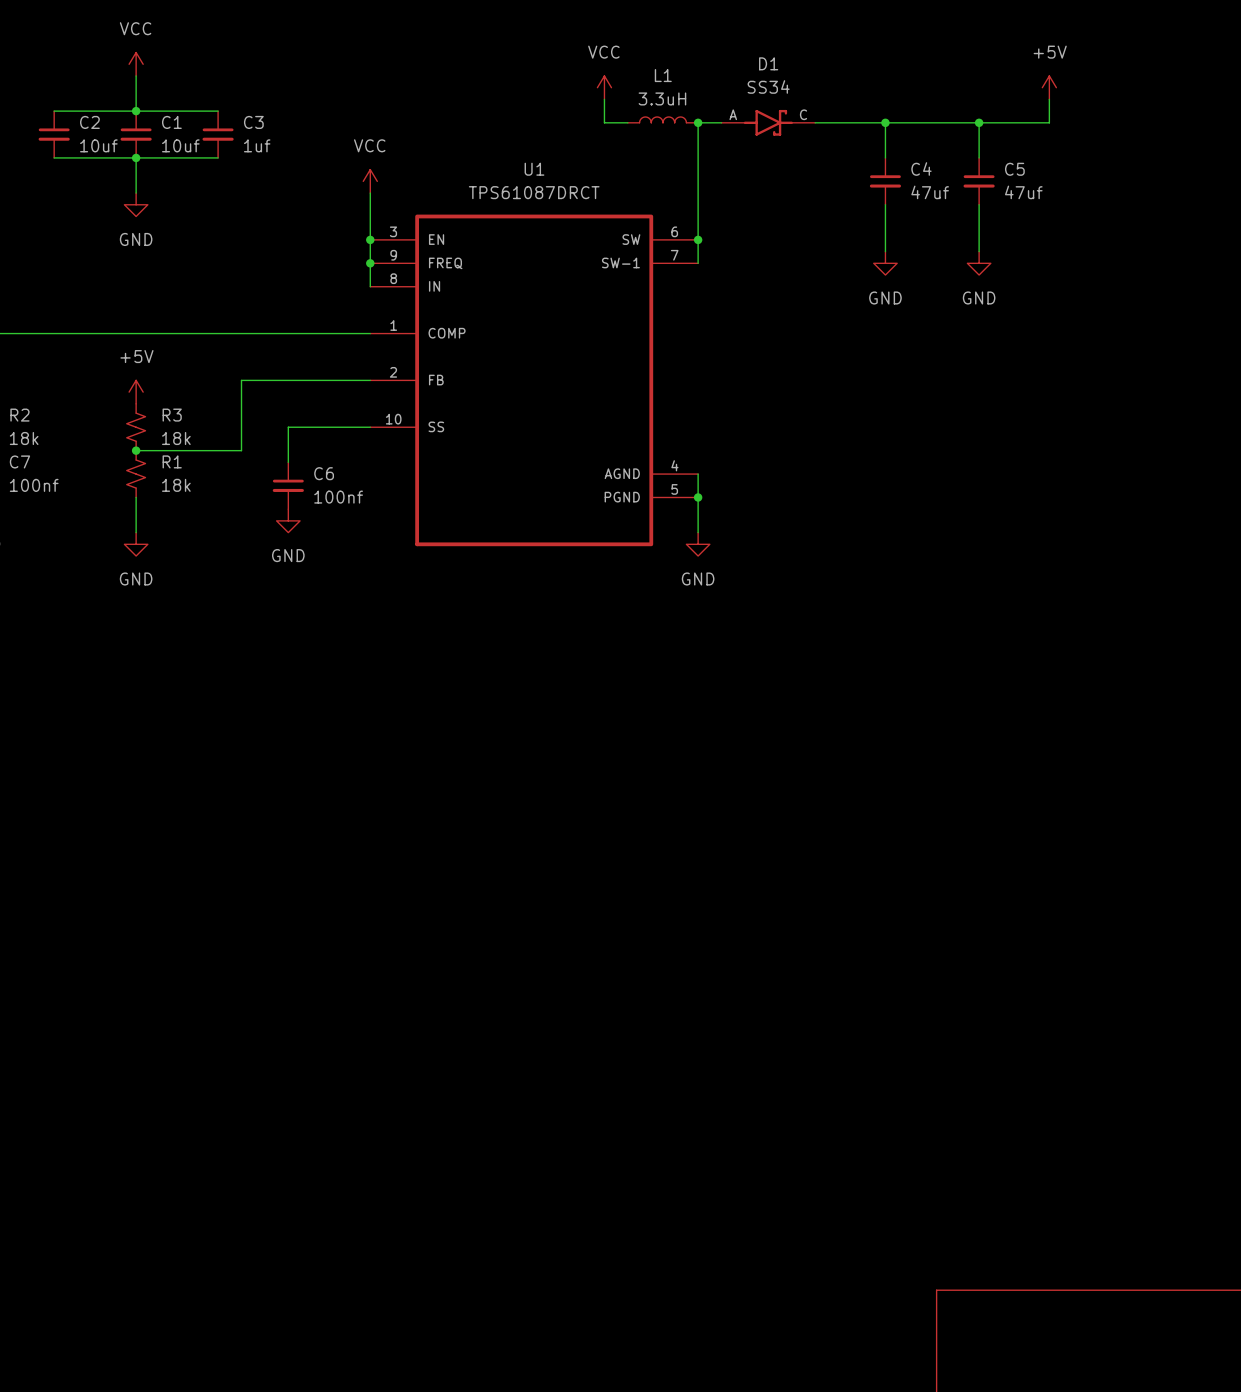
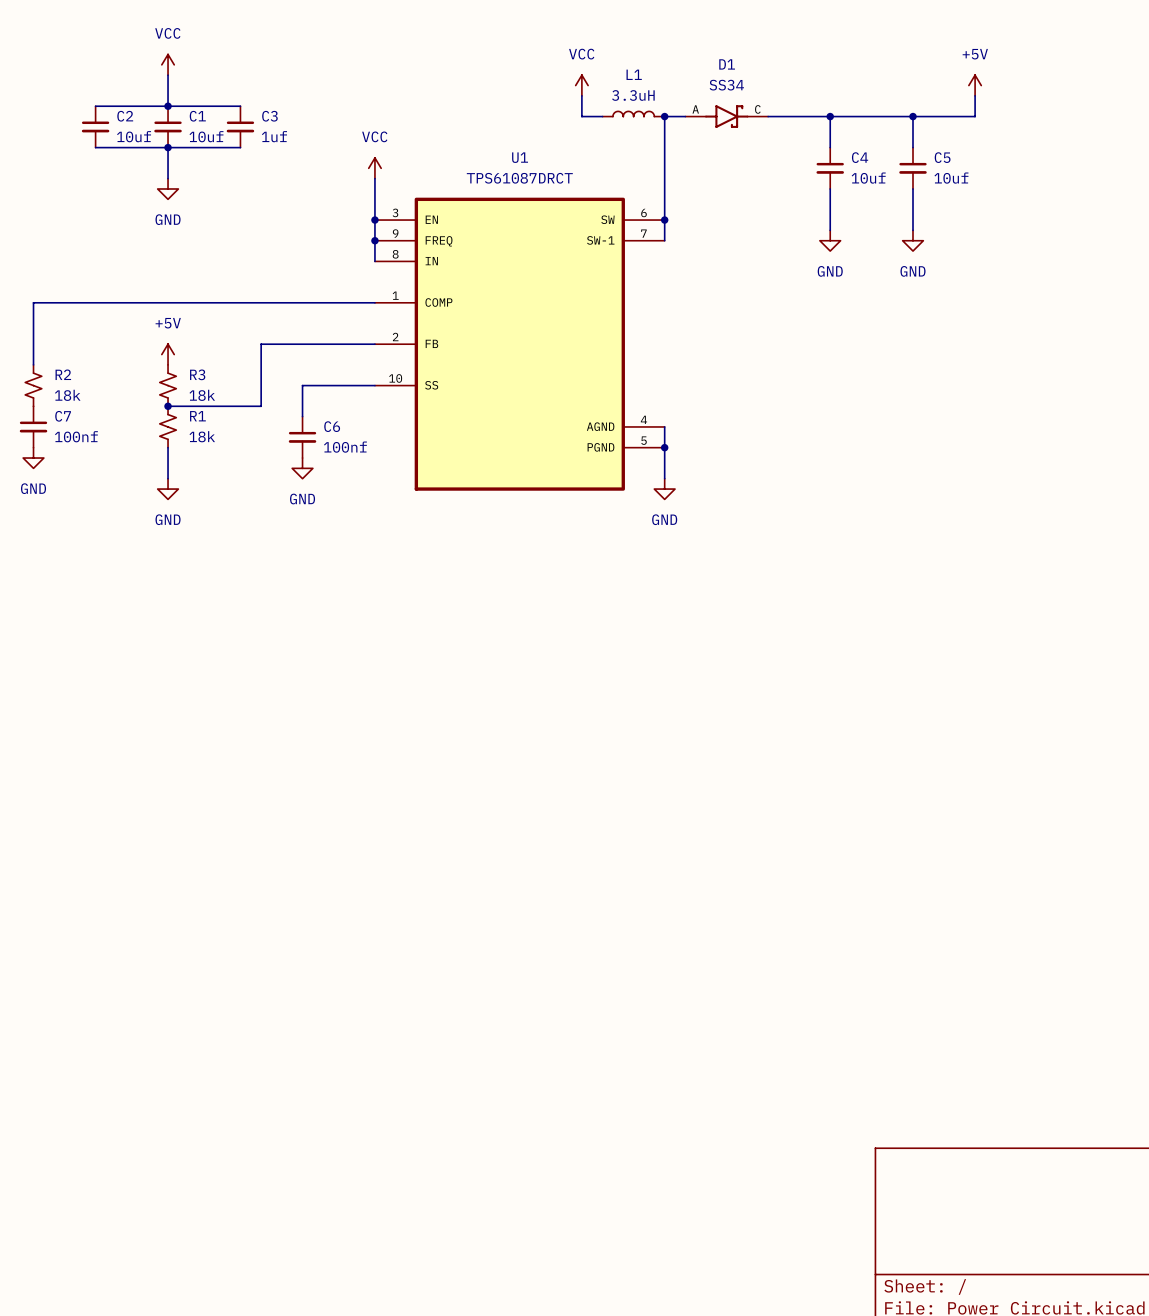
C4 value: 47uf (930, 192) -> 10uf (868, 178)
C5 value: 47uf (1023, 192) -> 10uf (951, 178)

